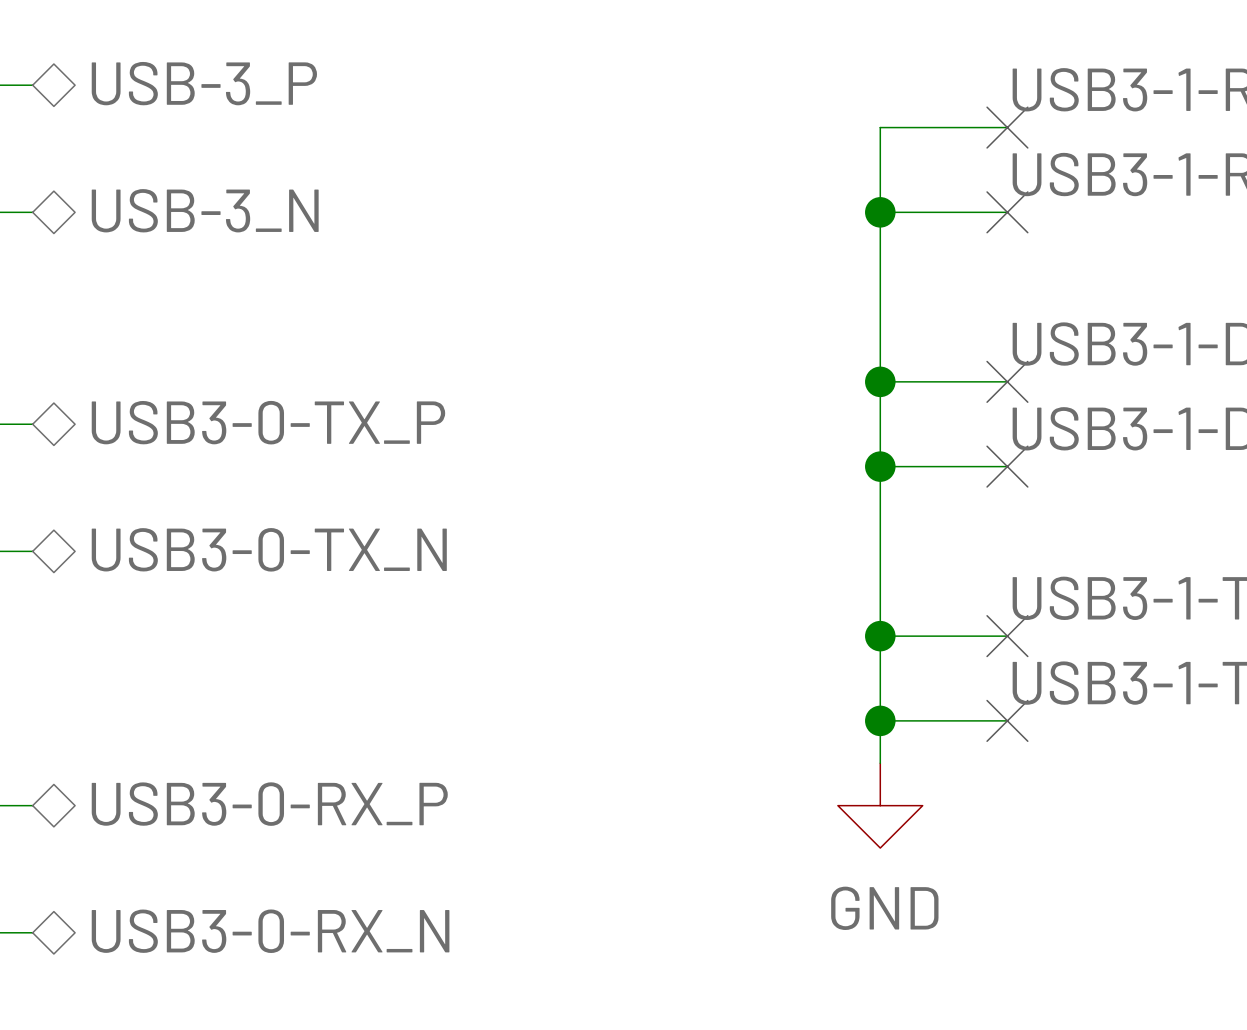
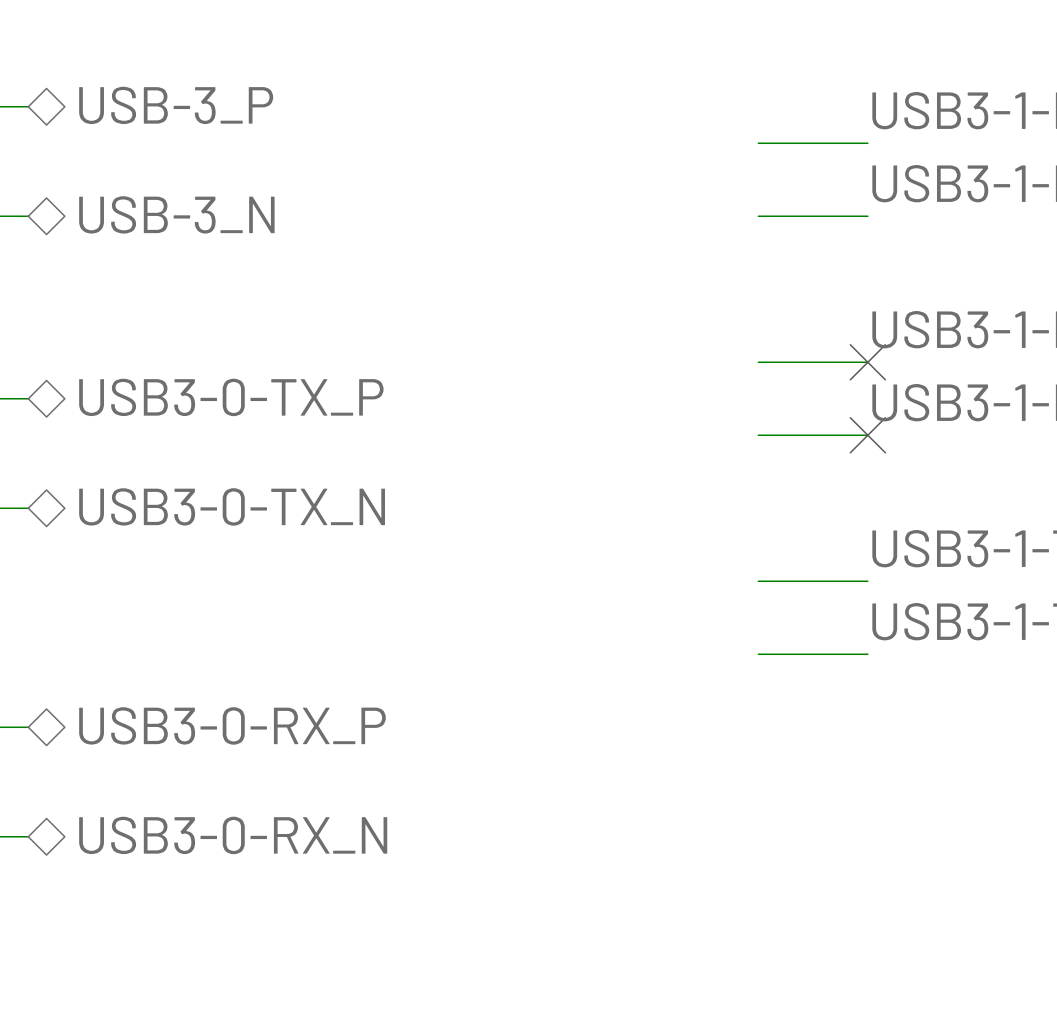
wire: (880, 127) (880, 763) -> none
no-connect mark: (1007, 127) -> none
junction: (880, 212) -> none
no-connect mark: (1007, 212) -> none
junction: (880, 381) -> none
junction: (880, 466) -> none
junction: (880, 636) -> none
no-connect mark: (1007, 636) -> none
junction: (880, 720) -> none
no-connect mark: (1007, 720) -> none
power symbol: GND (880, 805) -> none

